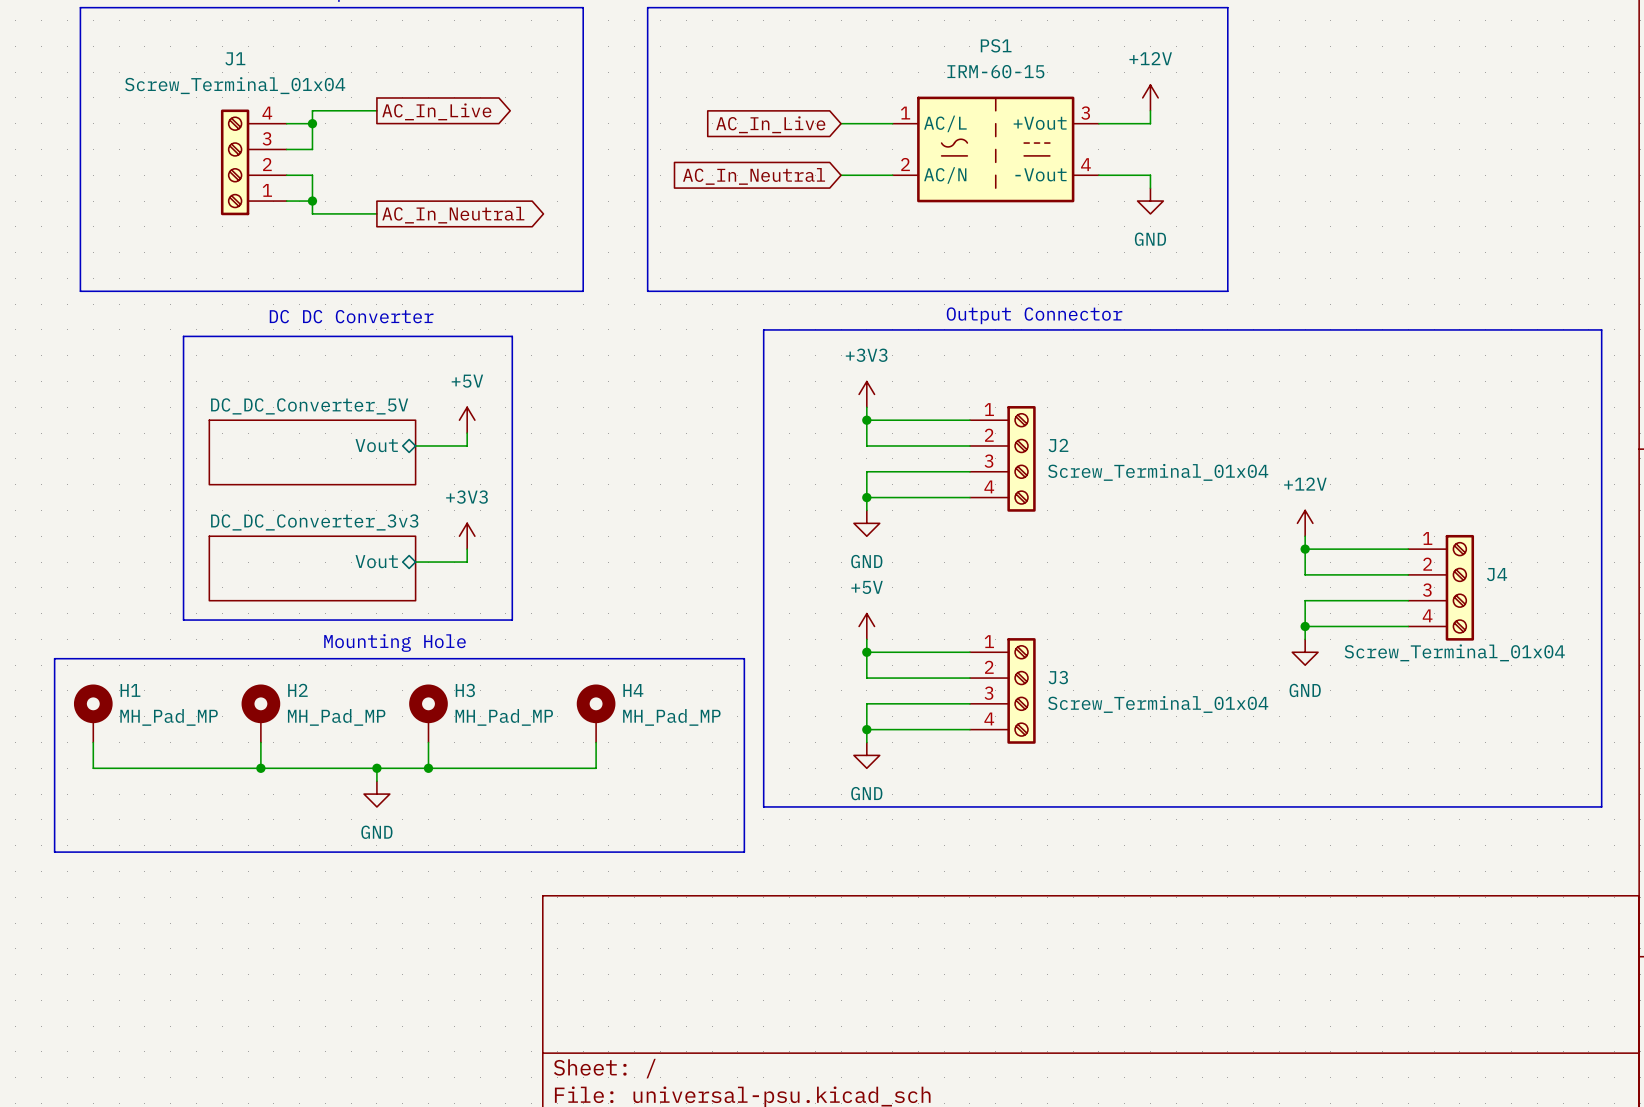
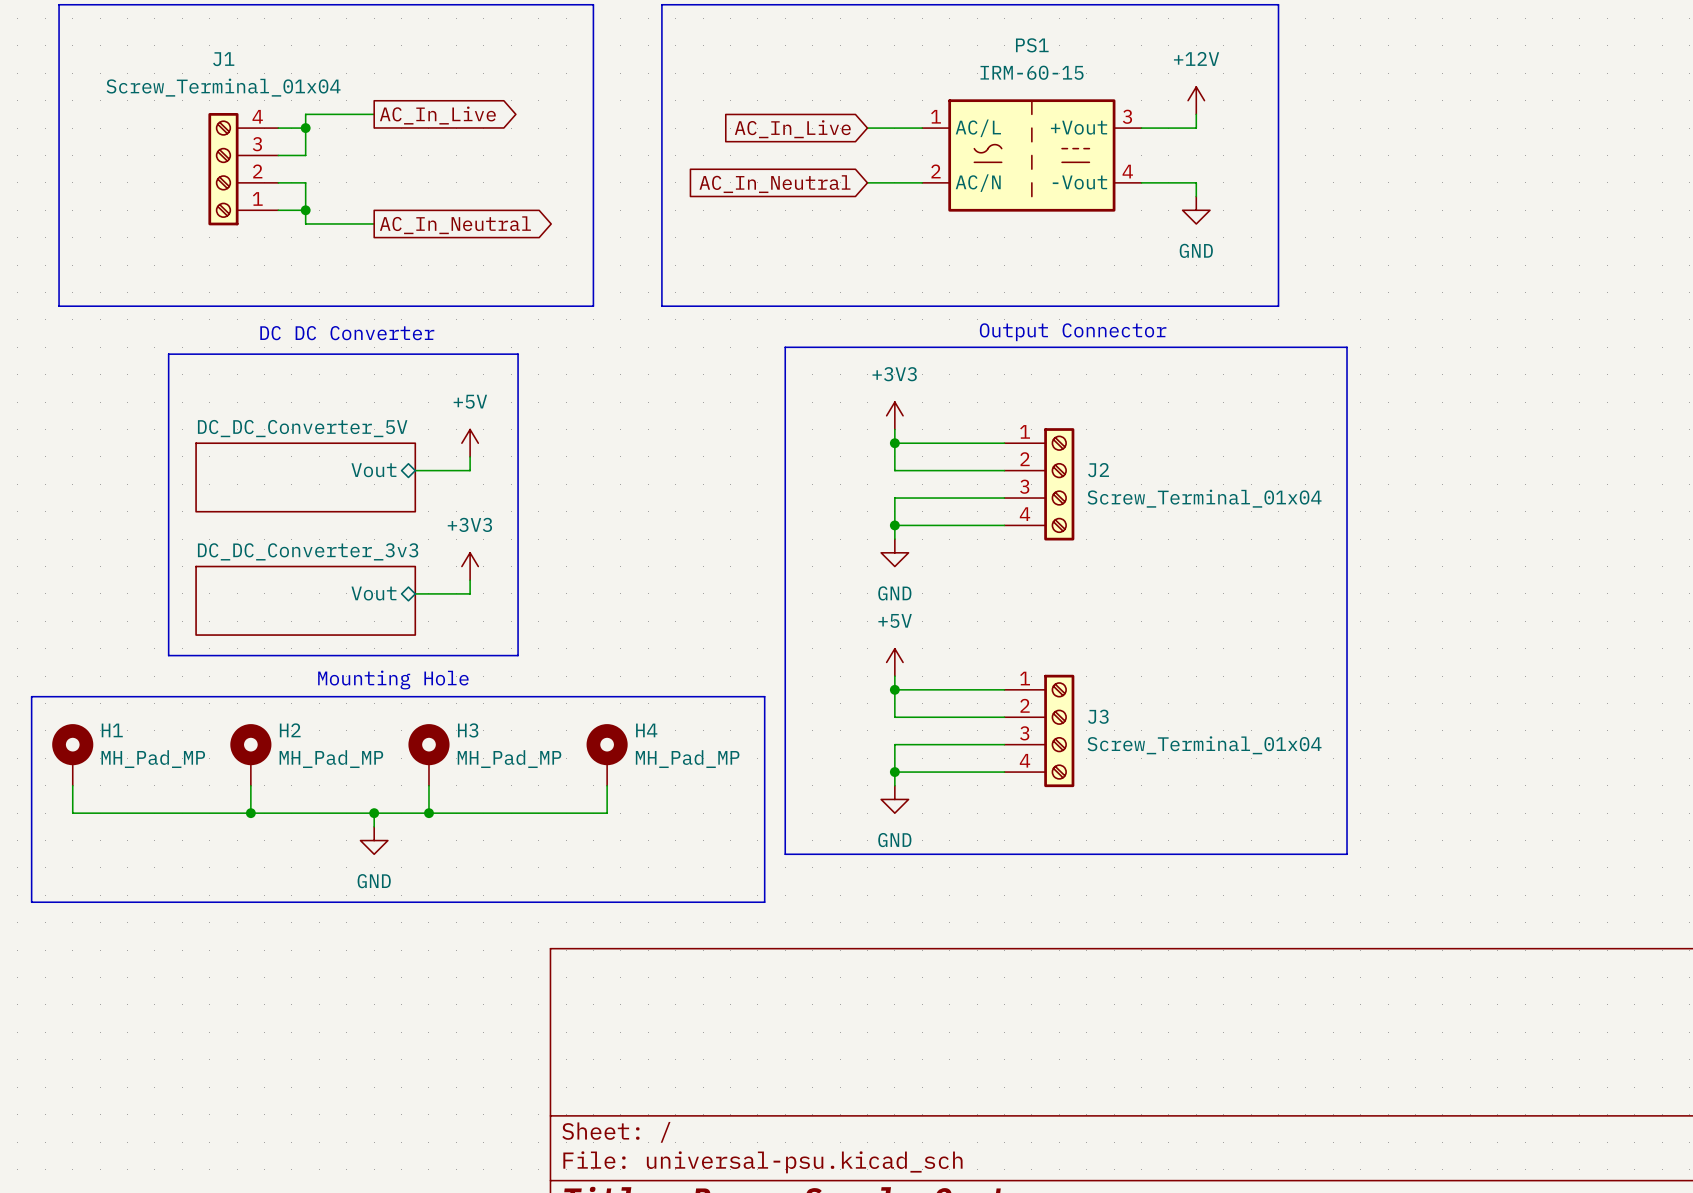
line: (1292, 329) (1601, 329) (1601, 806) (1292, 806) -> (1347, 347) (1347, 854)
power symbol: +12V (1305, 523) -> none
wire: (1305, 536) (1305, 574) (1408, 574) -> none
wire: (1305, 549) (1408, 549) -> none
junction: (1305, 549) -> none
J4: Screw_Terminal_01x04 (1441, 587) -> none
wire: (1408, 600) (1305, 600) (1305, 639) -> none
wire: (1305, 626) (1408, 626) -> none
junction: (1305, 626) -> none
power symbol: GND (1305, 652) -> none

